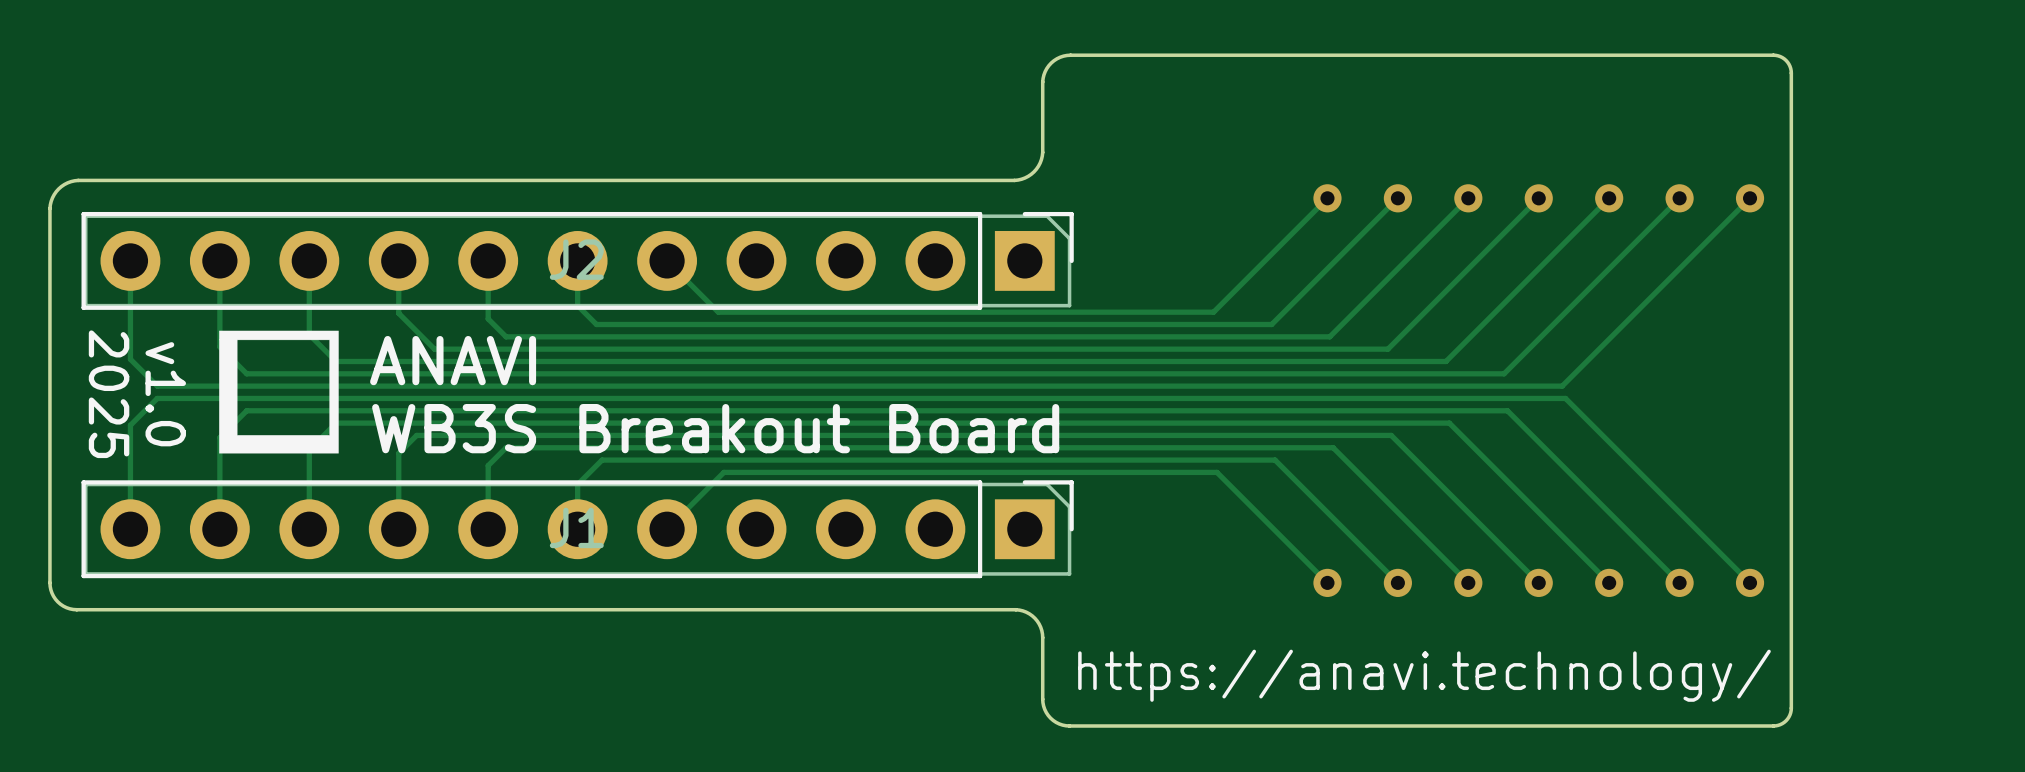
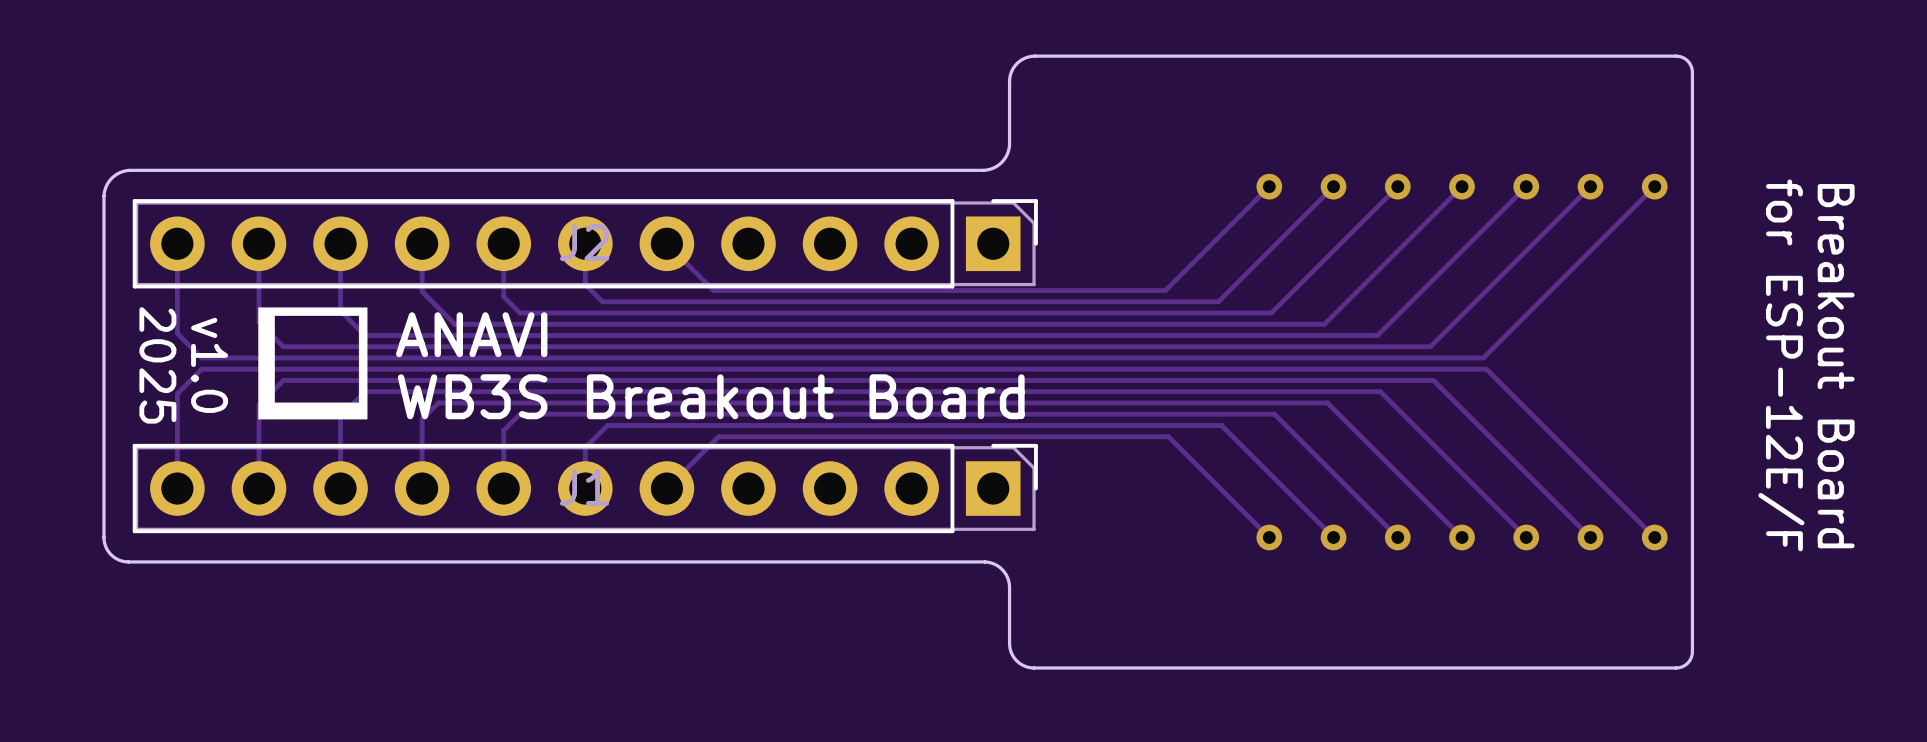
text: none -> for ESP-12E/F (1781, 365)
text: none -> Breakout Board (1836, 366)
text: https://anavi.technology/ (1424, 675) -> none

